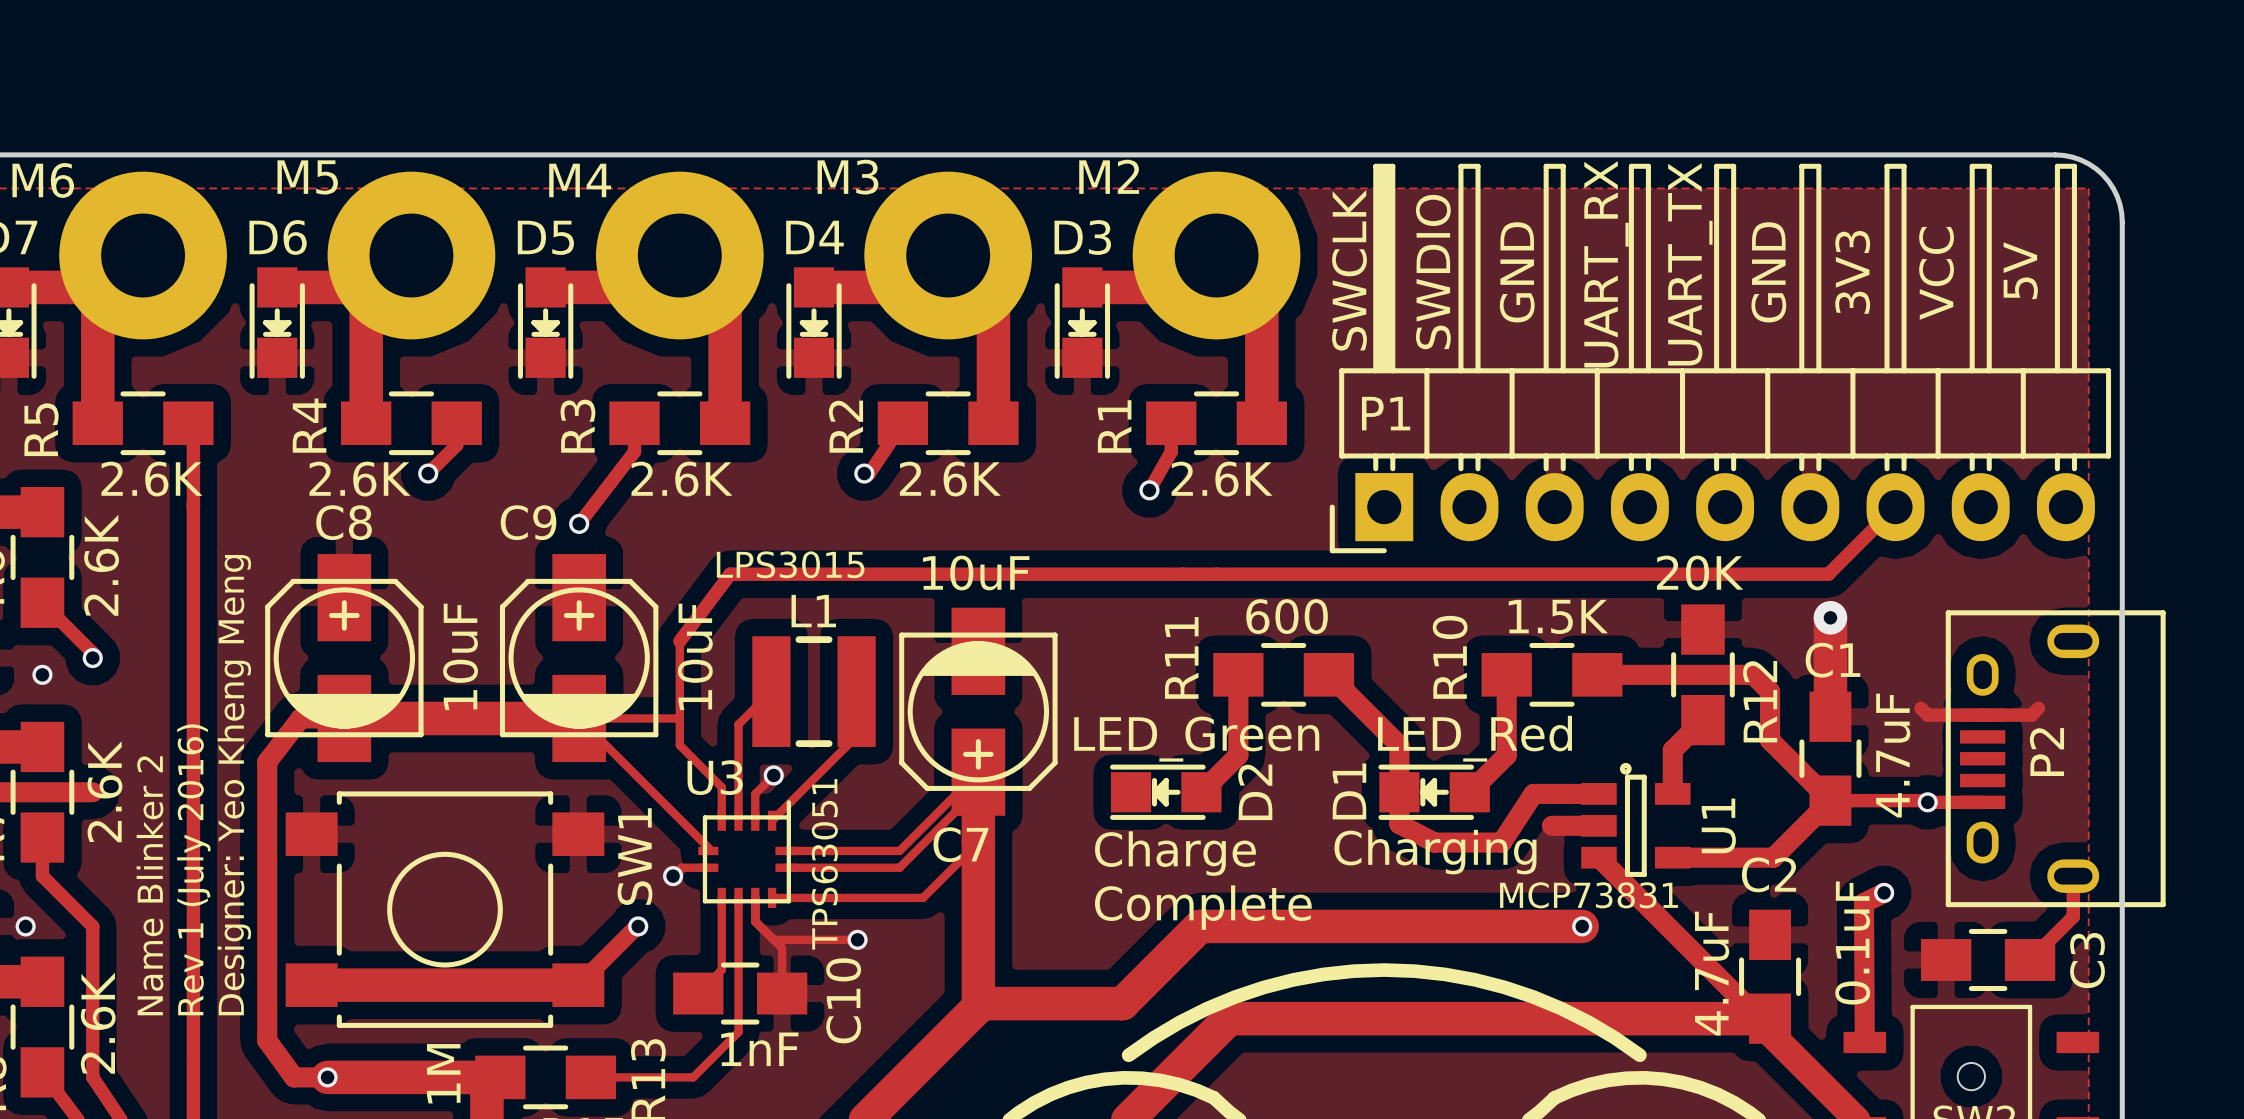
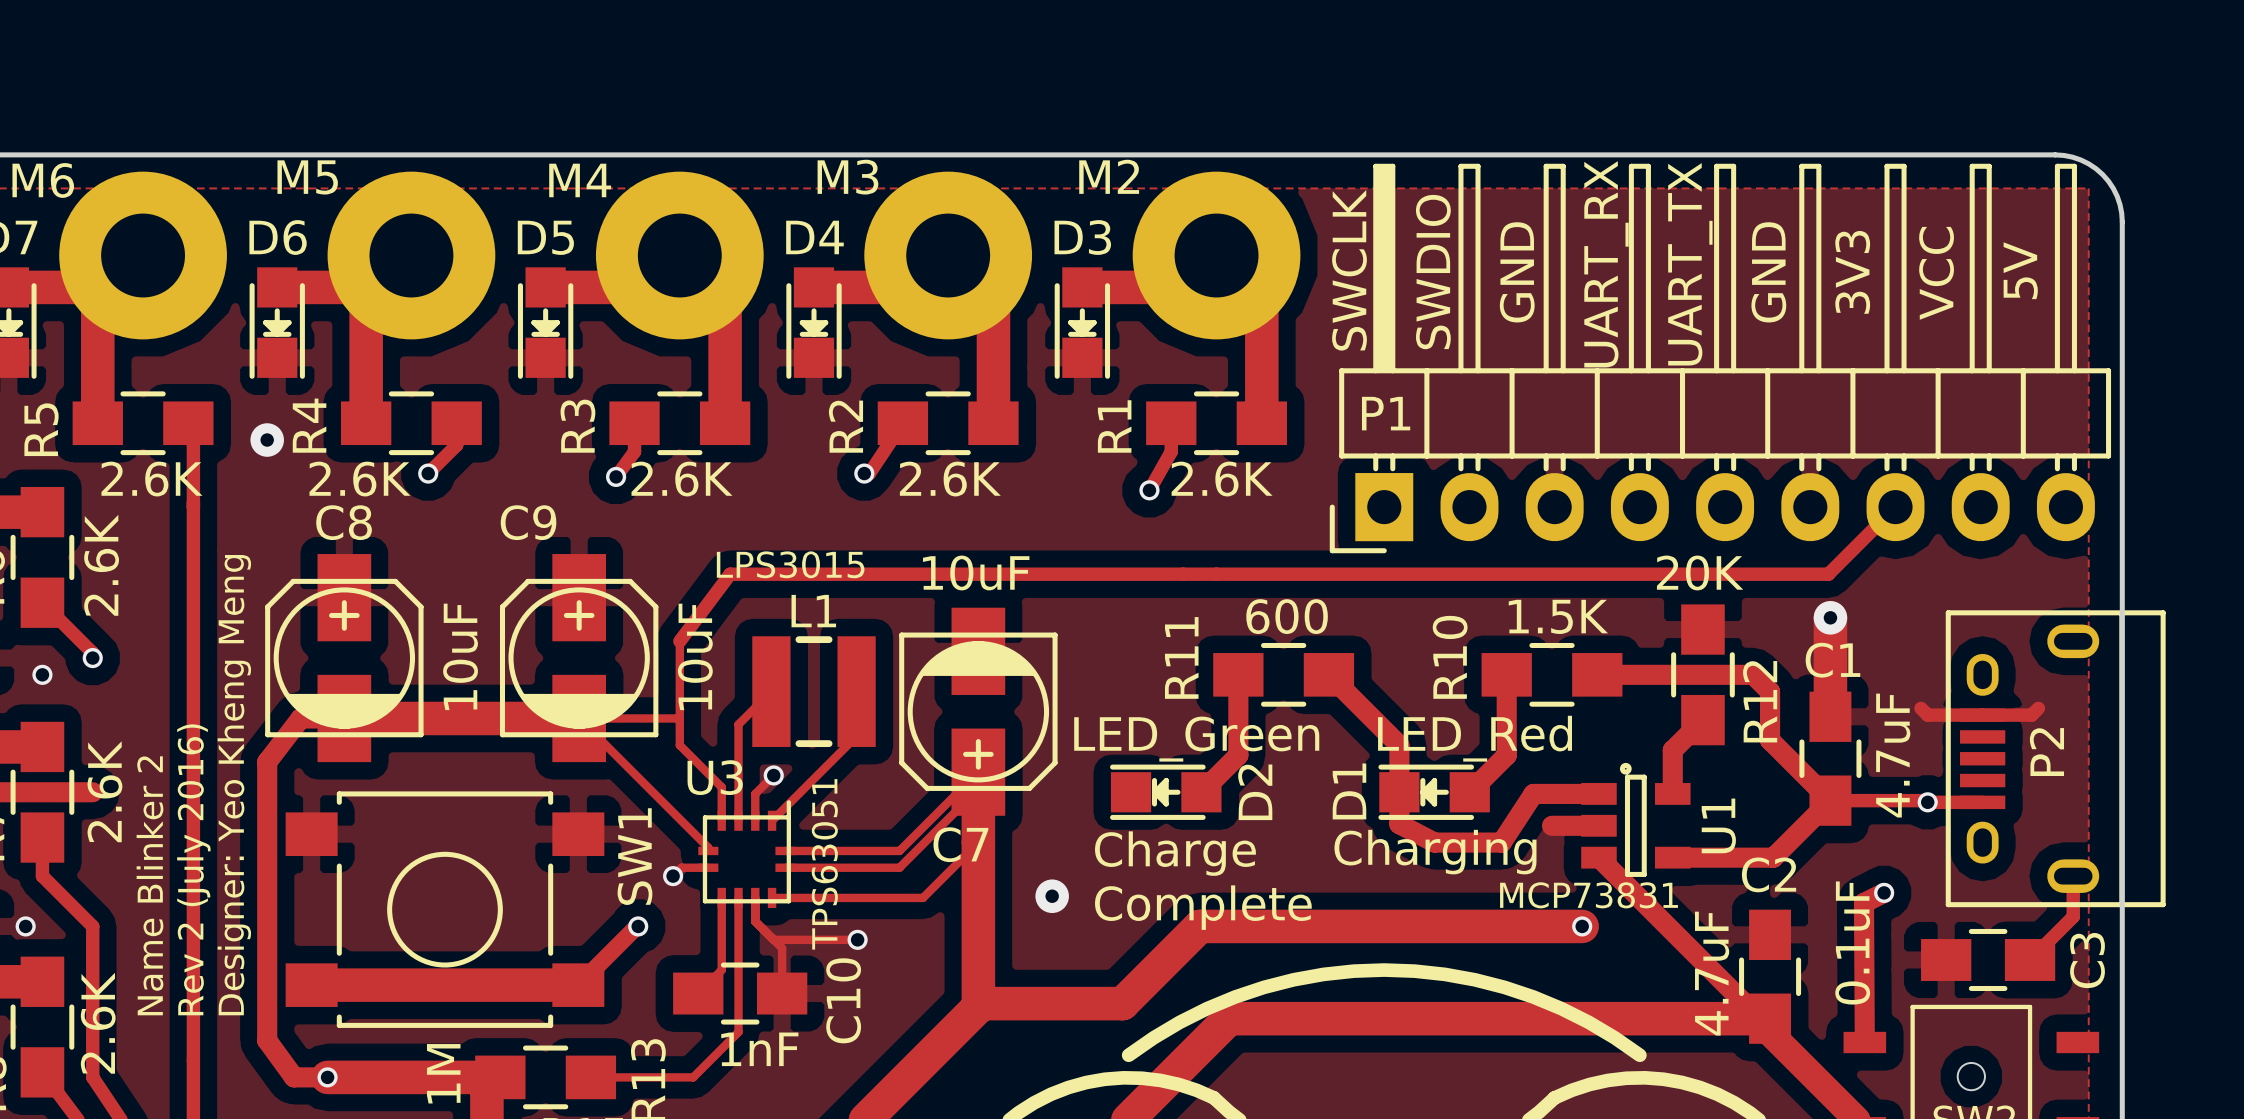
via: none -> (267, 440)
track: (634, 451) (579, 523) -> (634, 451) (616, 476)
via position: (579, 523) -> (616, 476)
text: Rev 1 (July 2016) (193, 869) -> Rev 2 (July 2016) (193, 869)
via: none -> (1052, 896)

